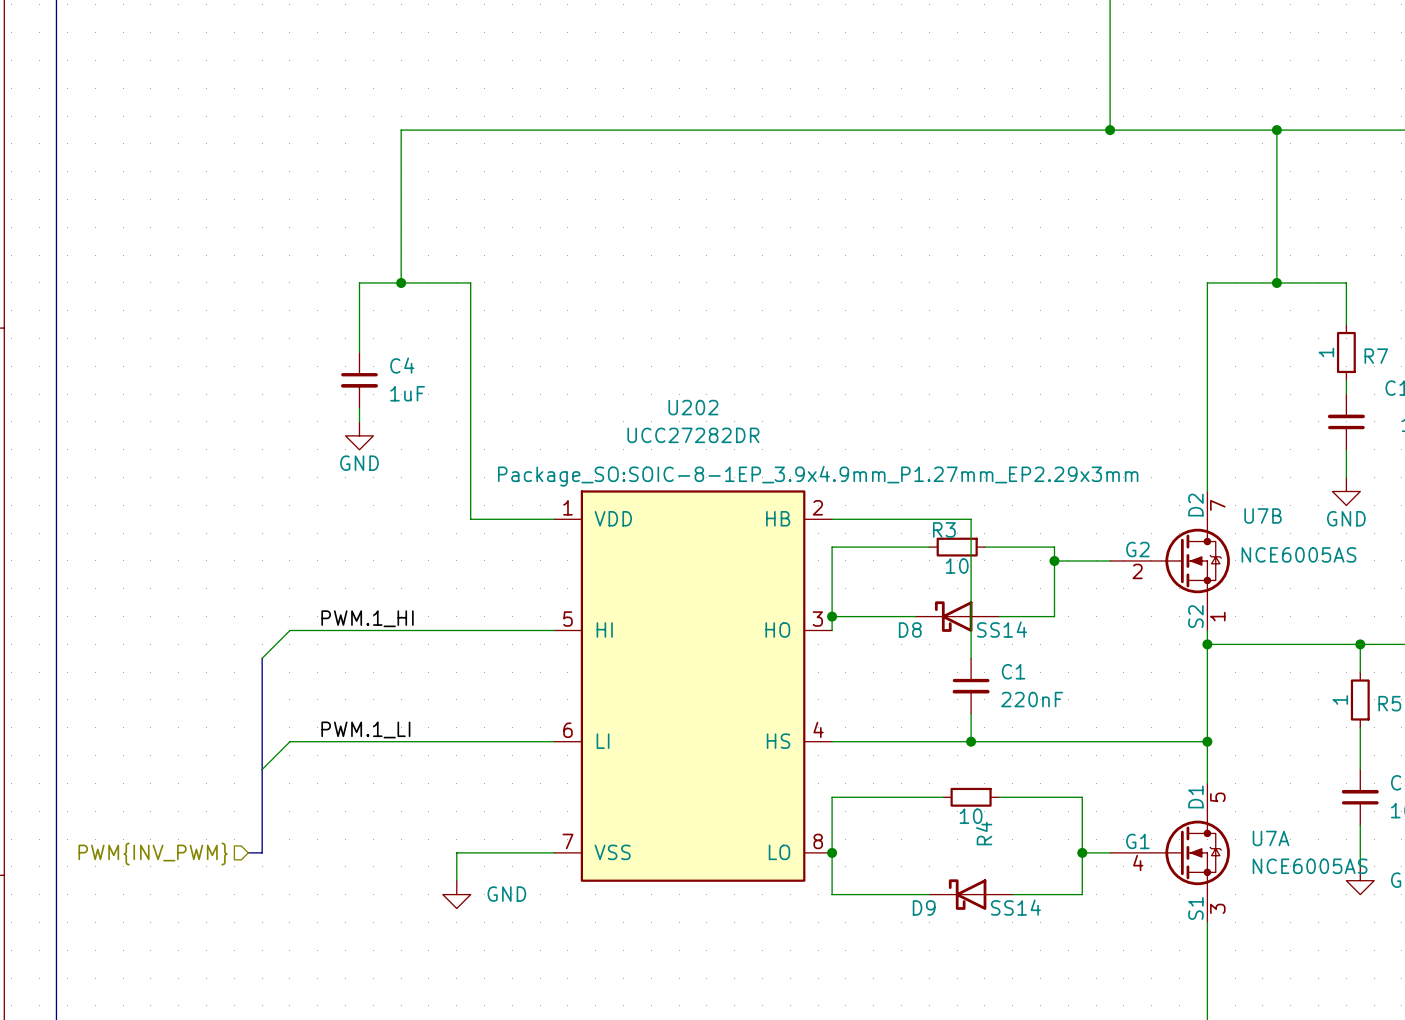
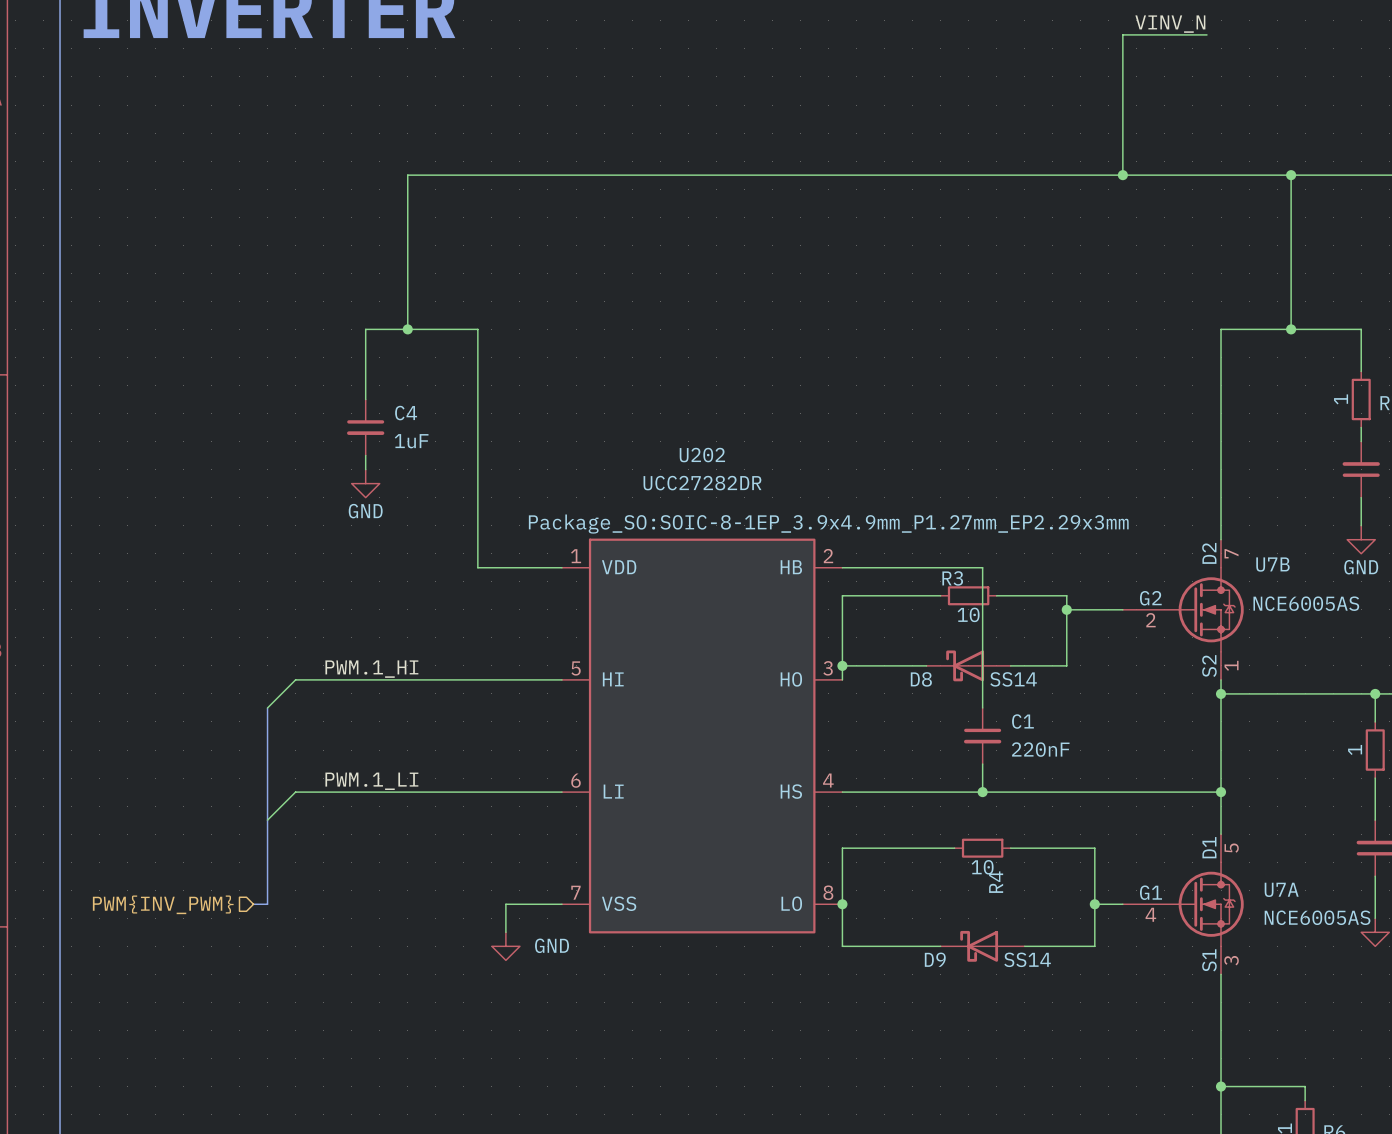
wire: (498, 852) (456, 852) (456, 880) -> (505, 904) (505, 932)
power symbol position: GND (456, 894) -> GND (505, 946)

